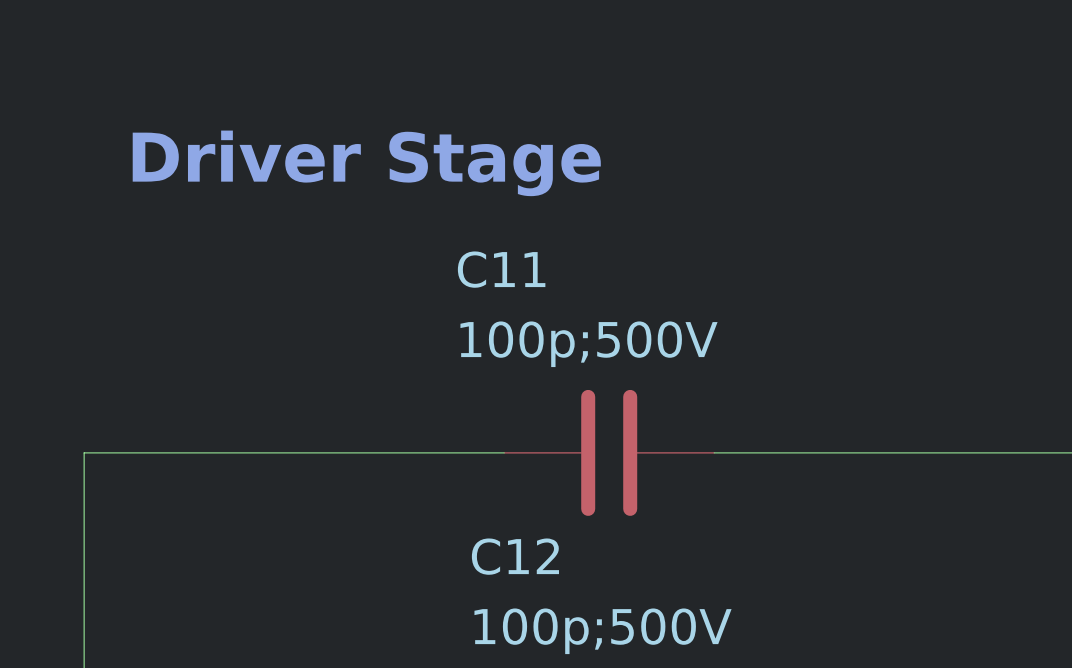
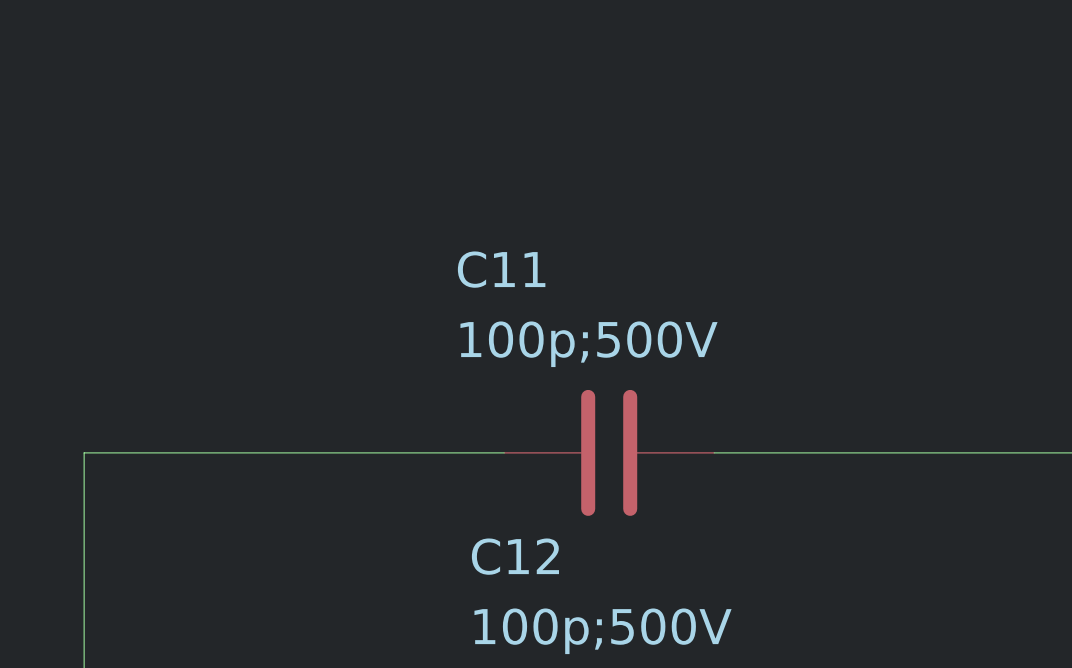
text: Driver Stage (366, 163) -> none

